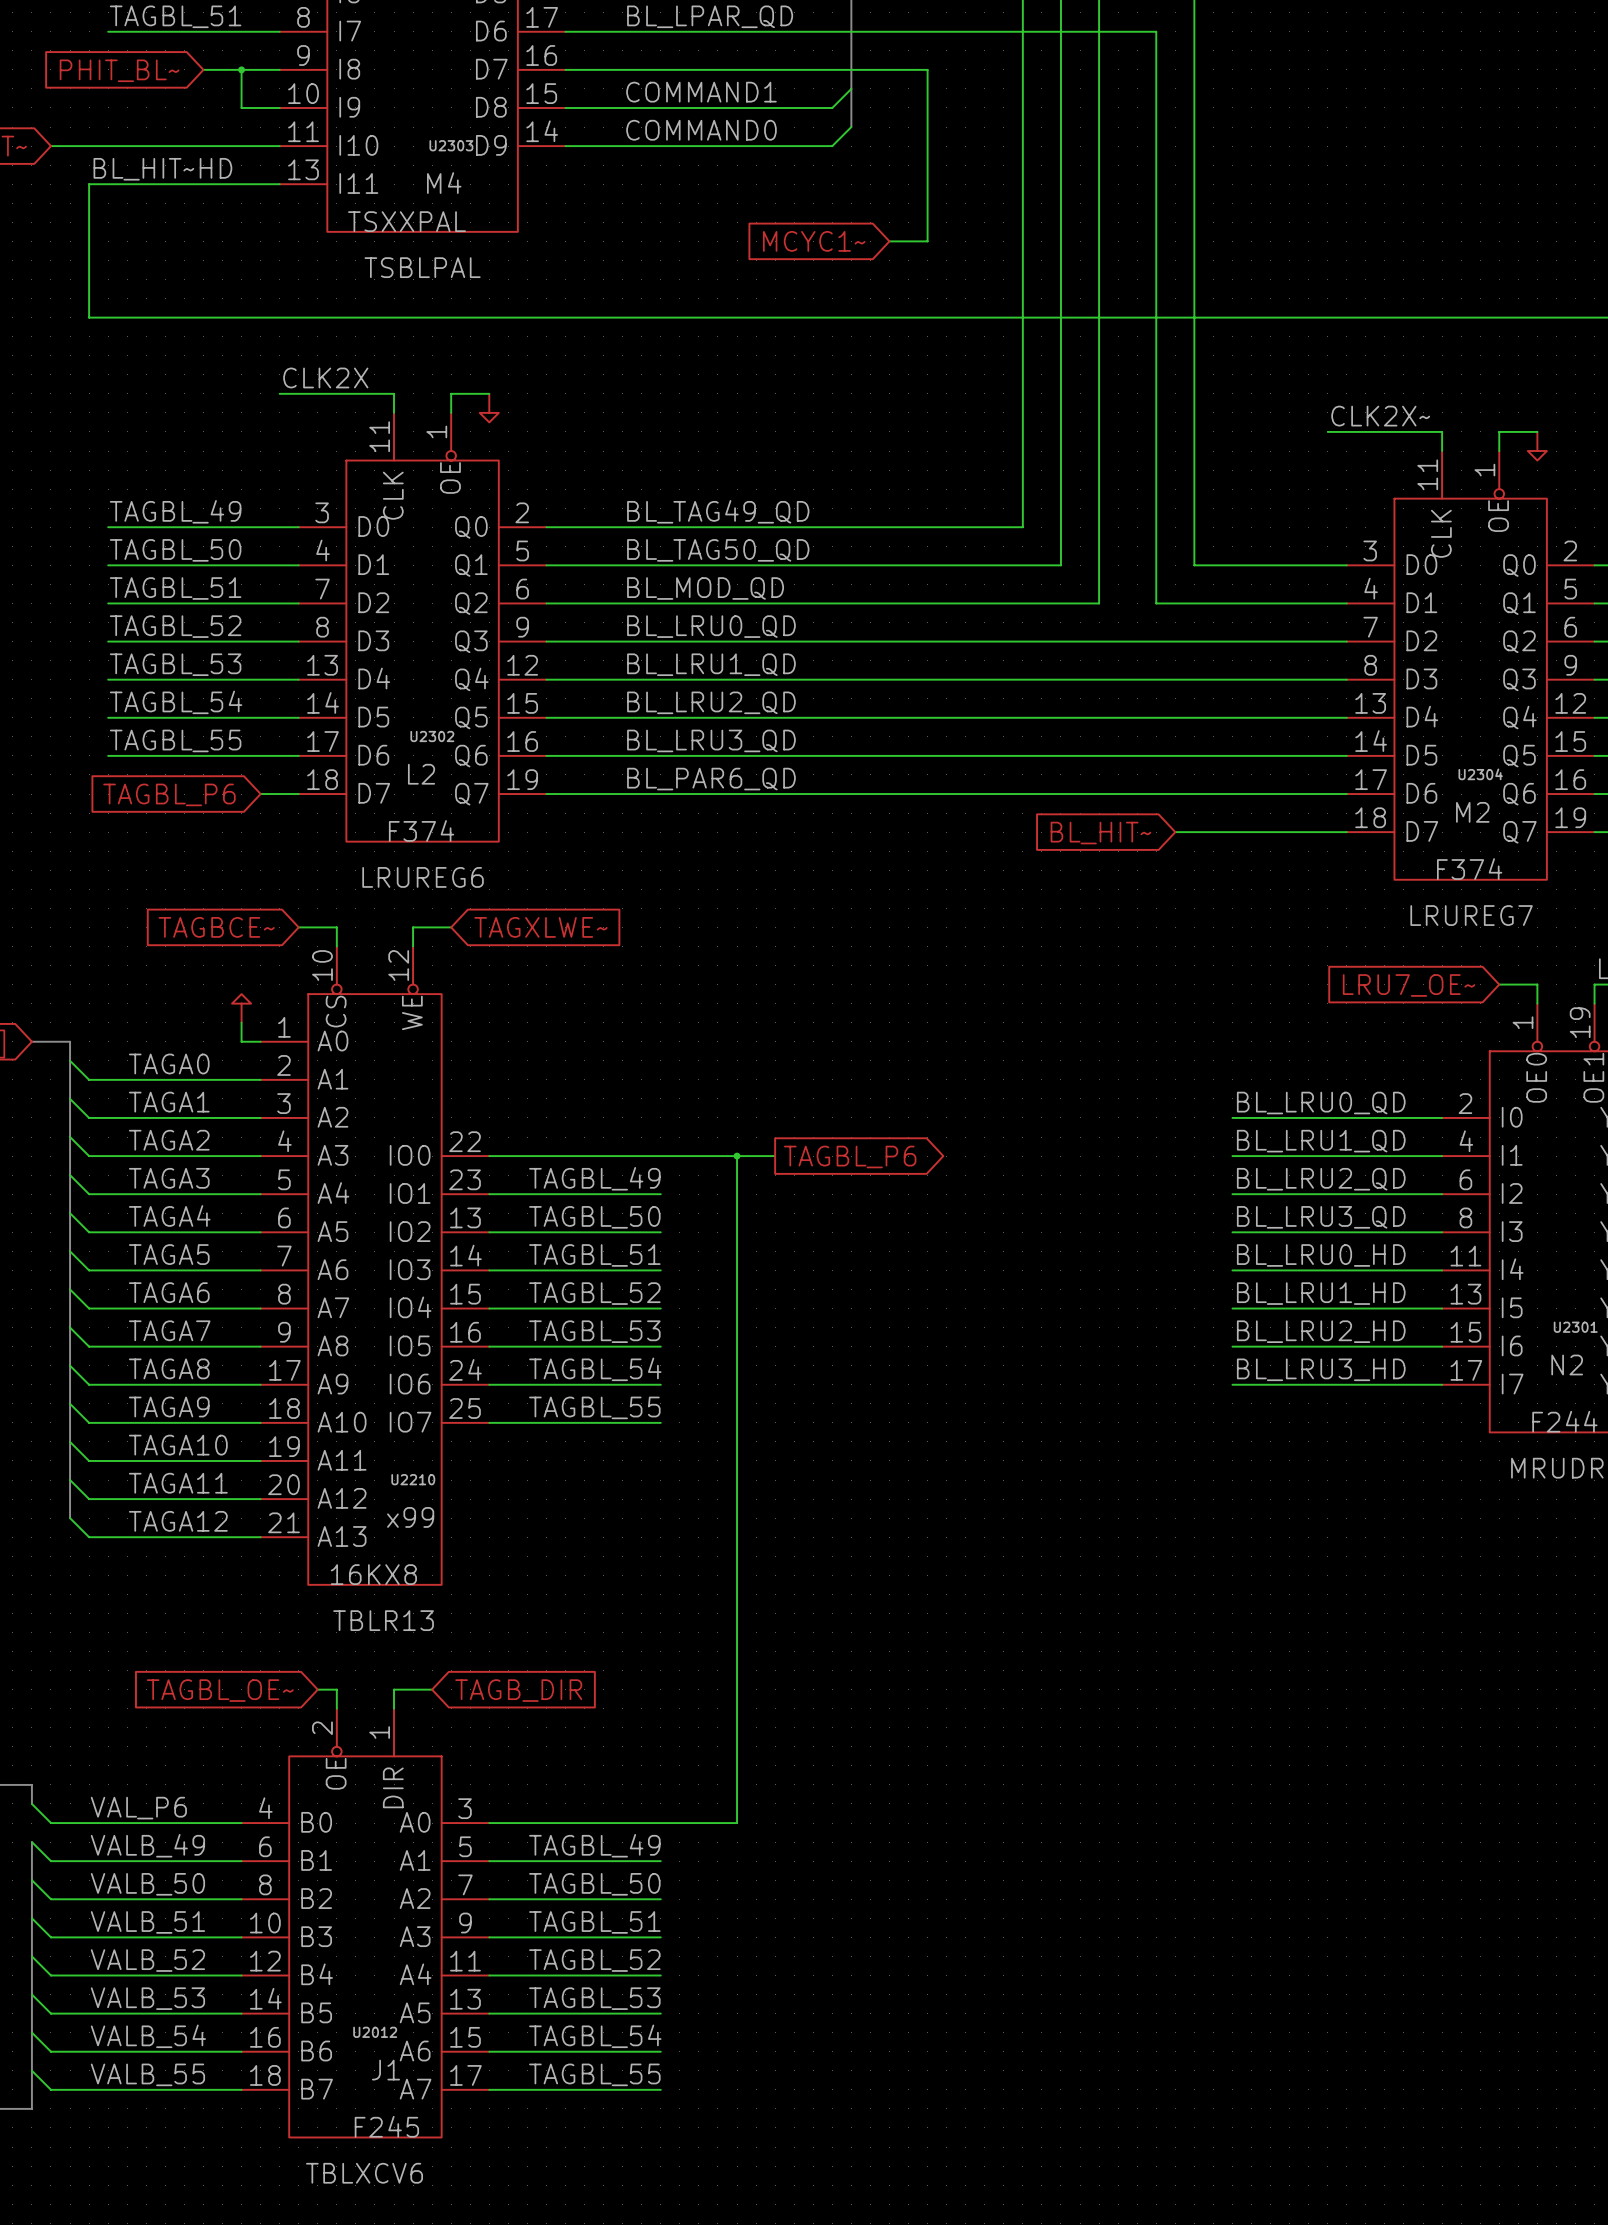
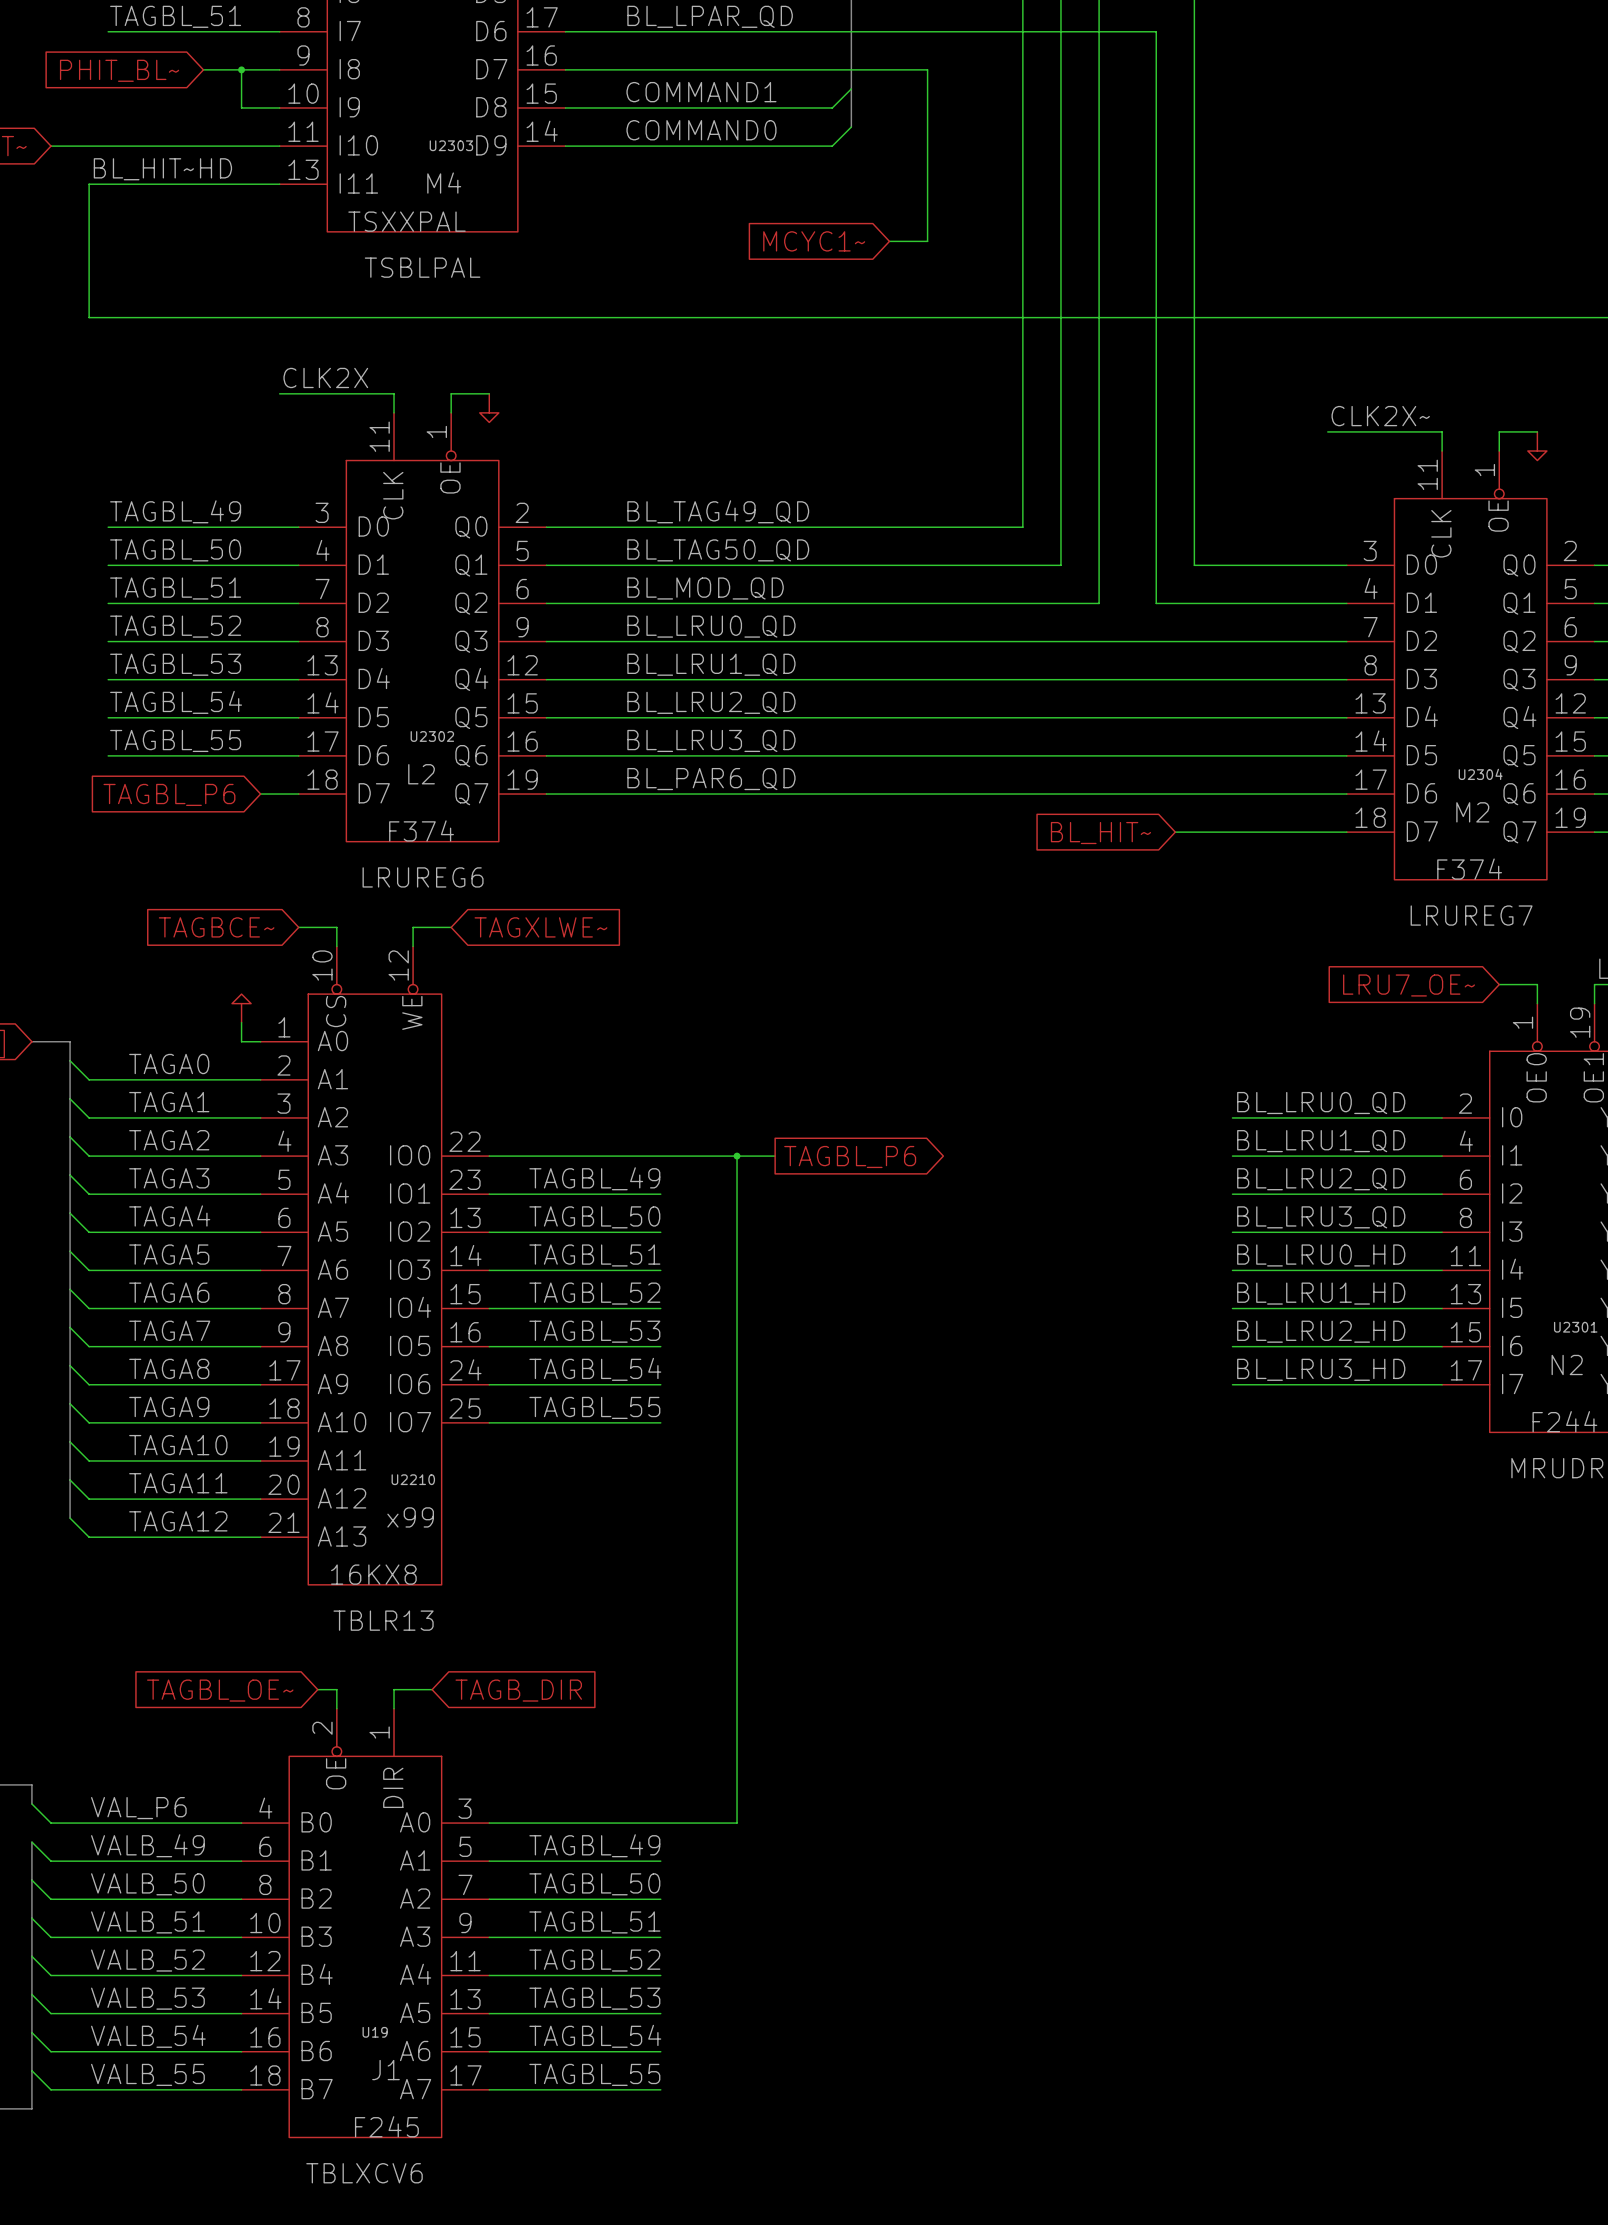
U2012 name: U2012 (375, 2032) -> U19 (375, 2032)

